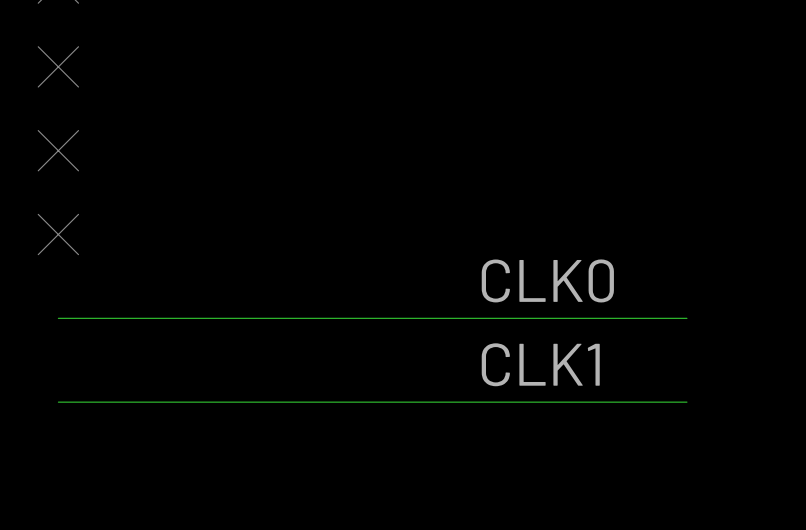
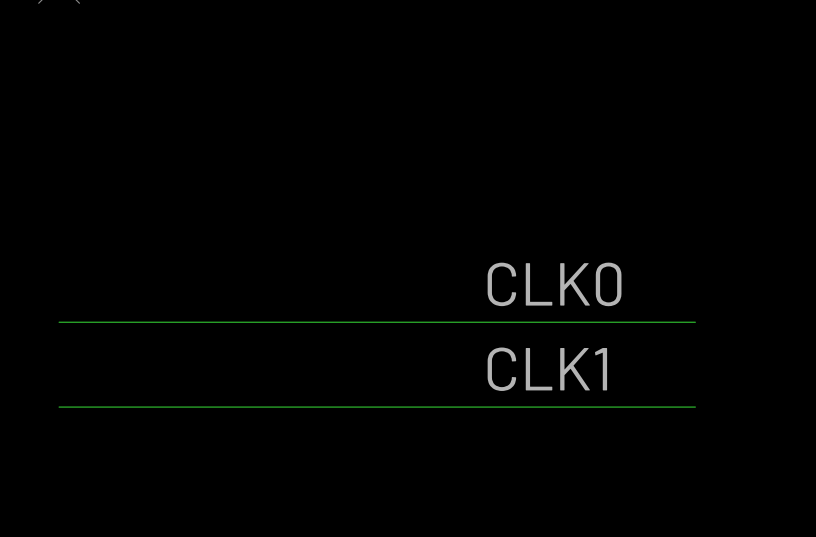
no-connect mark: (58, 66) -> none
no-connect mark: (58, 150) -> none
no-connect mark: (58, 234) -> none

